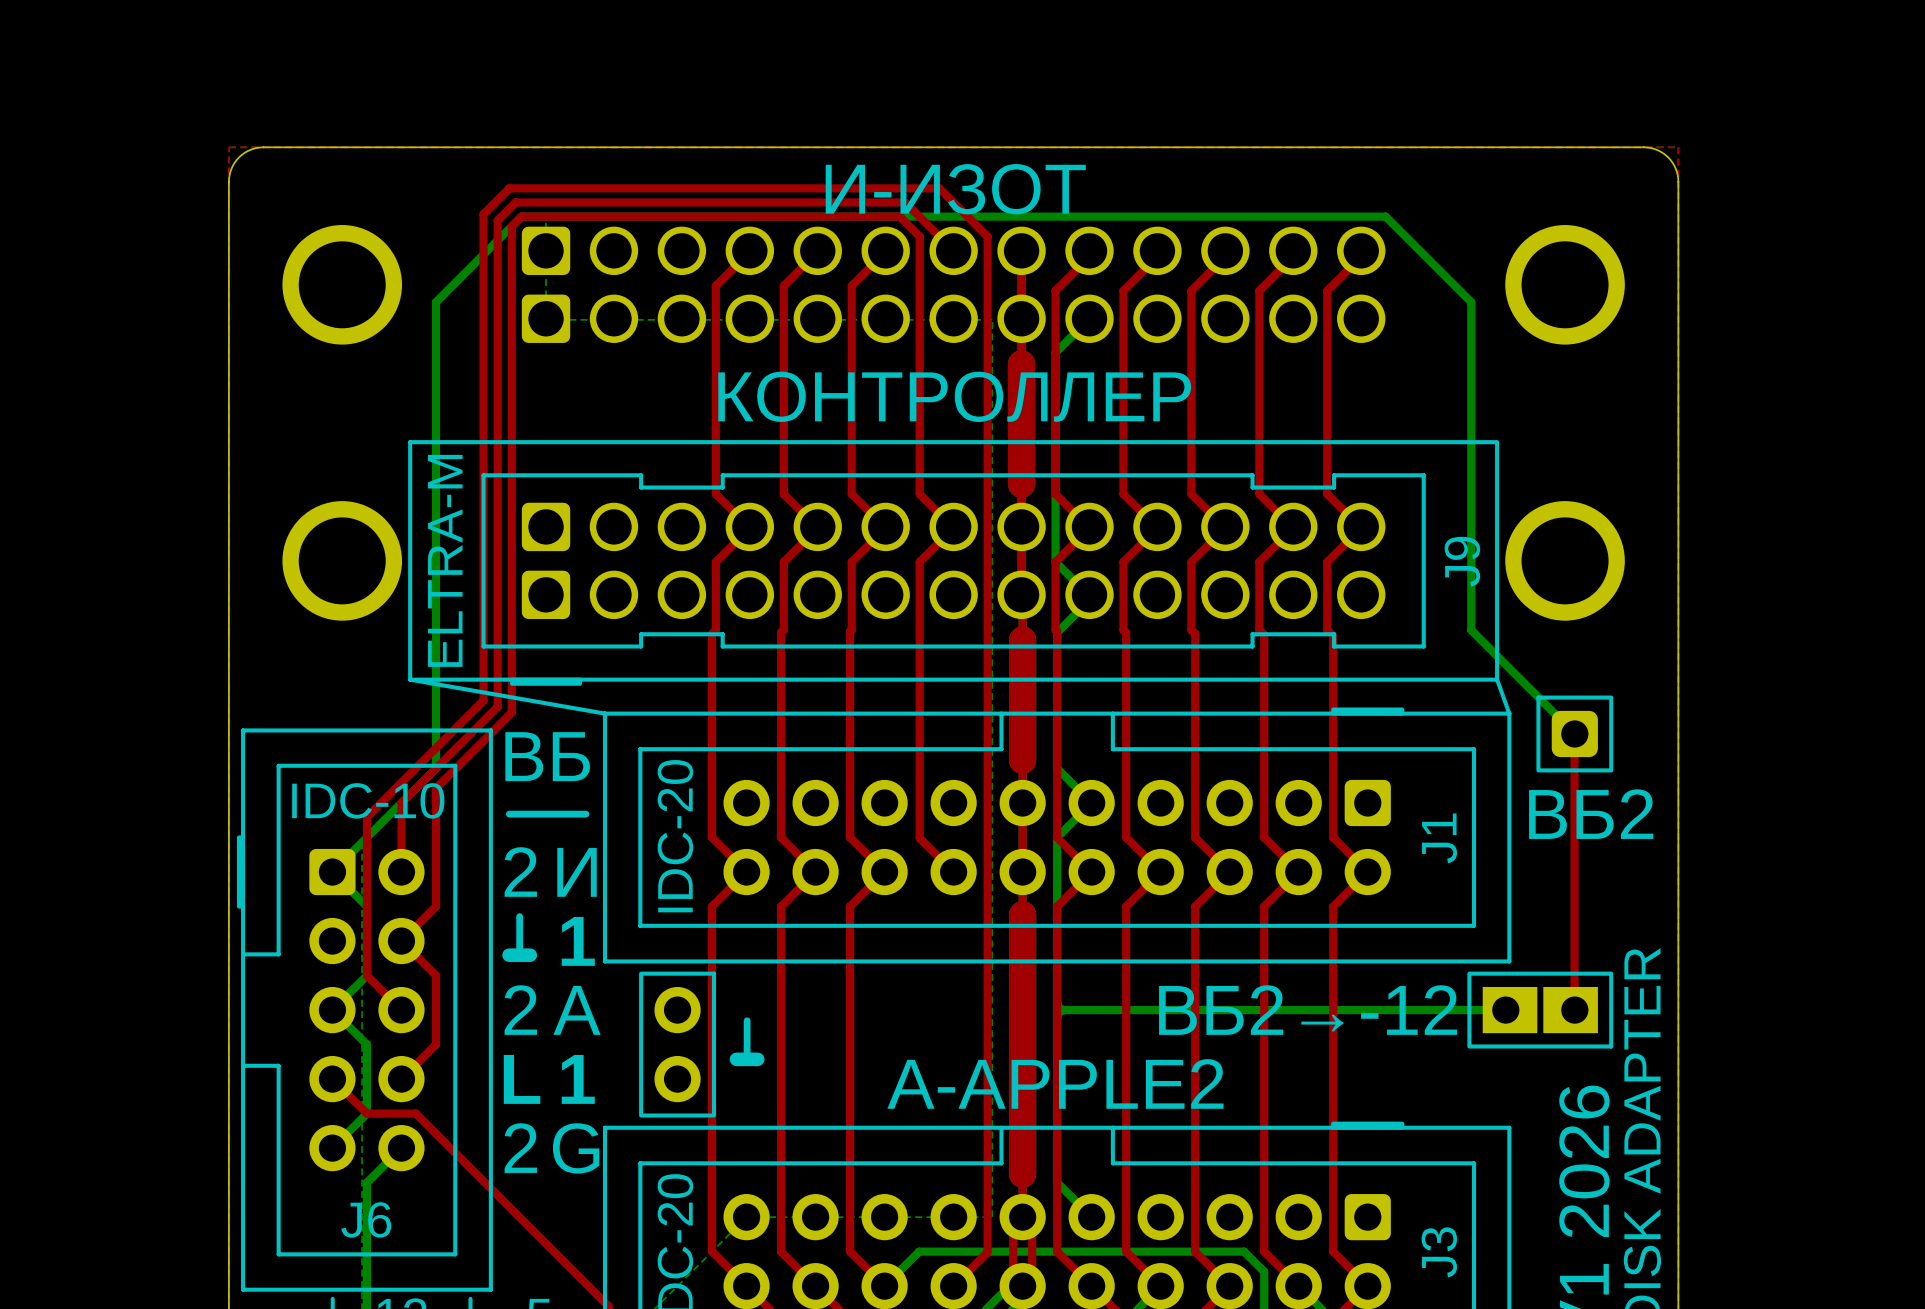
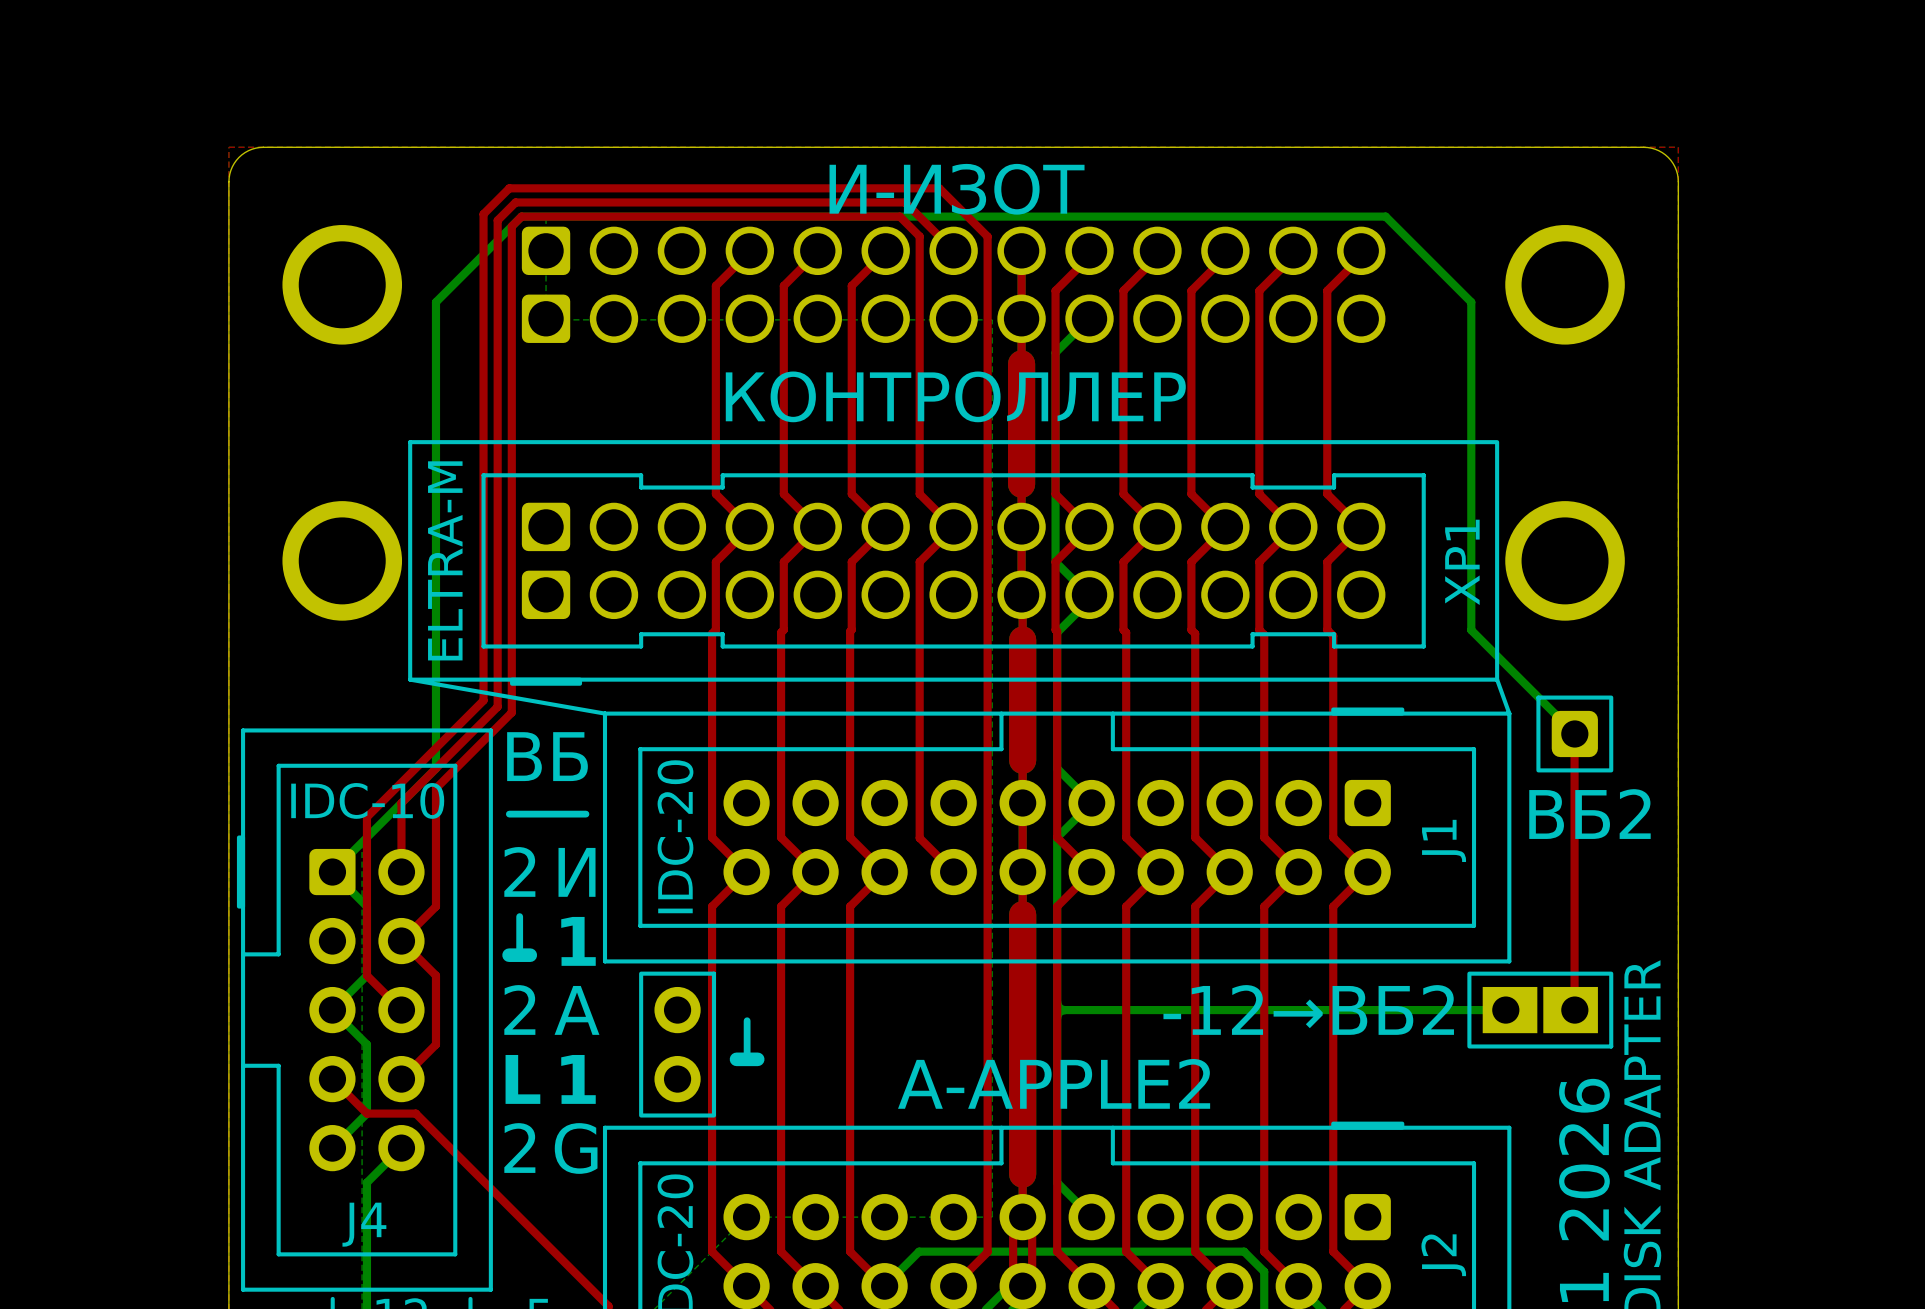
J9 name: J9 (1462, 561) -> XP1 (1462, 562)
part text: ВБ2→-12 (1308, 1010) -> -12→ВБ2 (1308, 1009)
J6 name: J6 (366, 1219) -> J4 (364, 1224)
J3 name: J3 (1439, 1252) -> J2 (1443, 1255)

